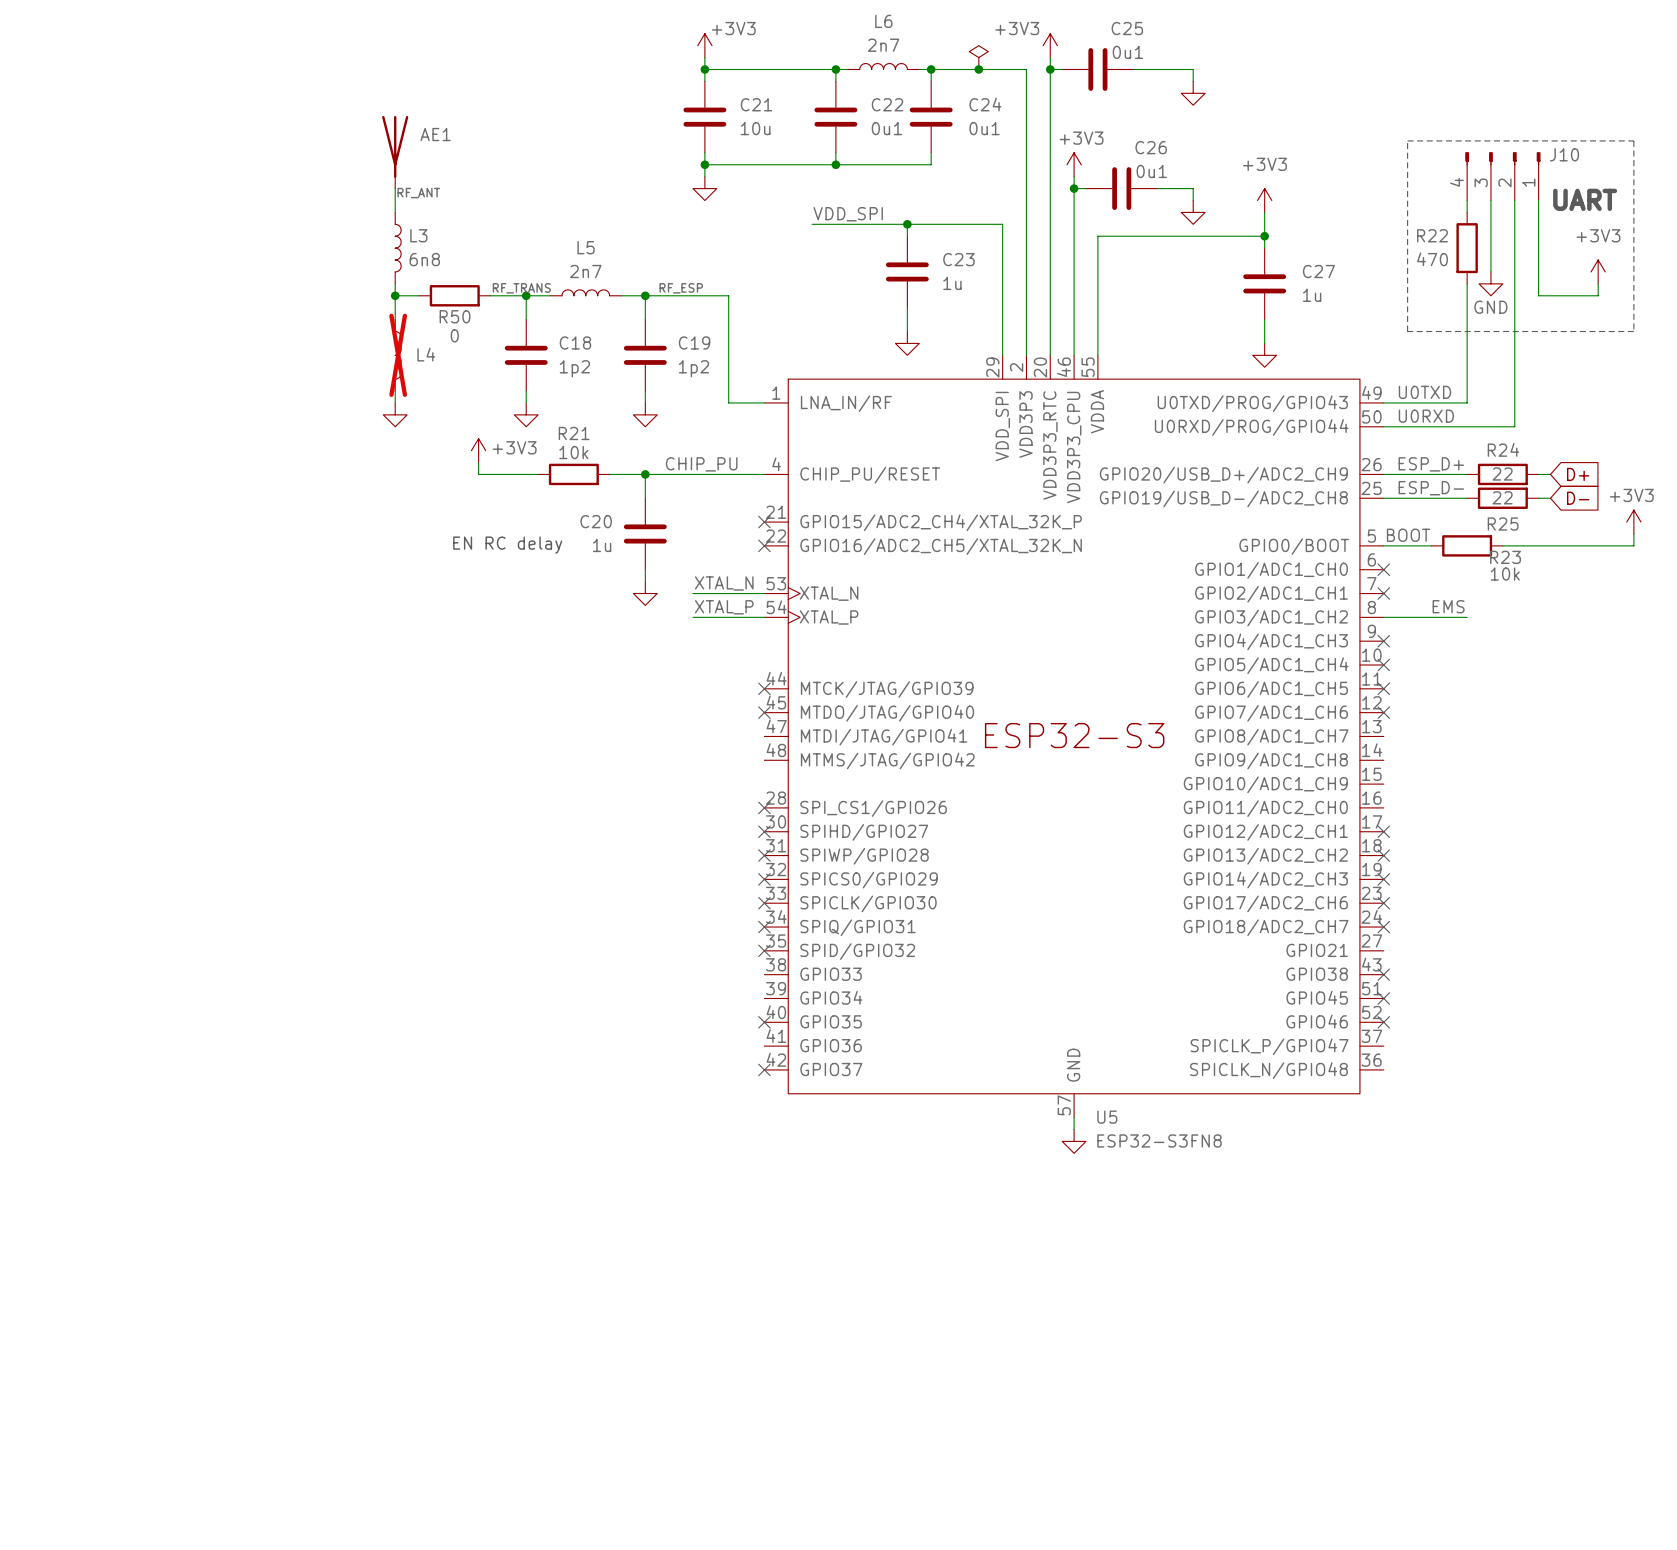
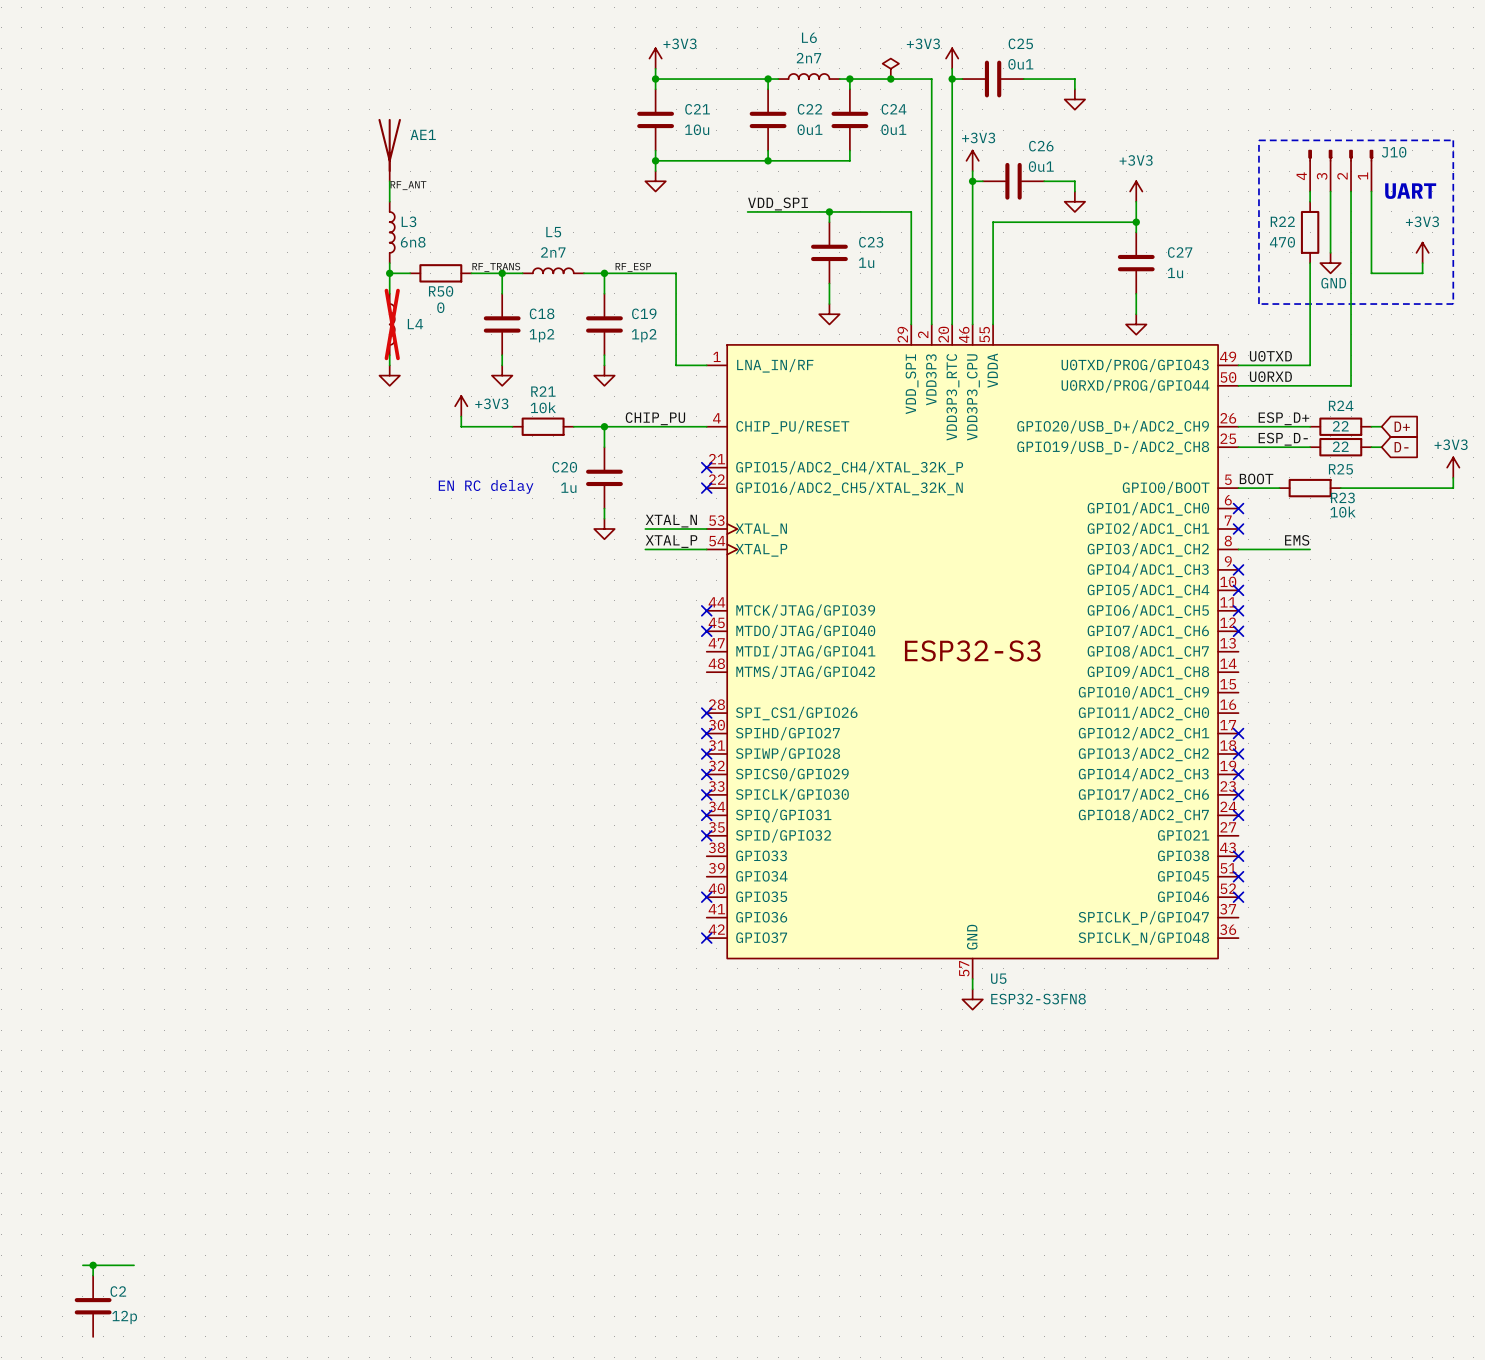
wire: none -> (82, 1265) (134, 1265)
wire: none -> (93, 1265) (93, 1275)
junction: none -> (93, 1265)
C2: none -> 12p (93, 1306)

